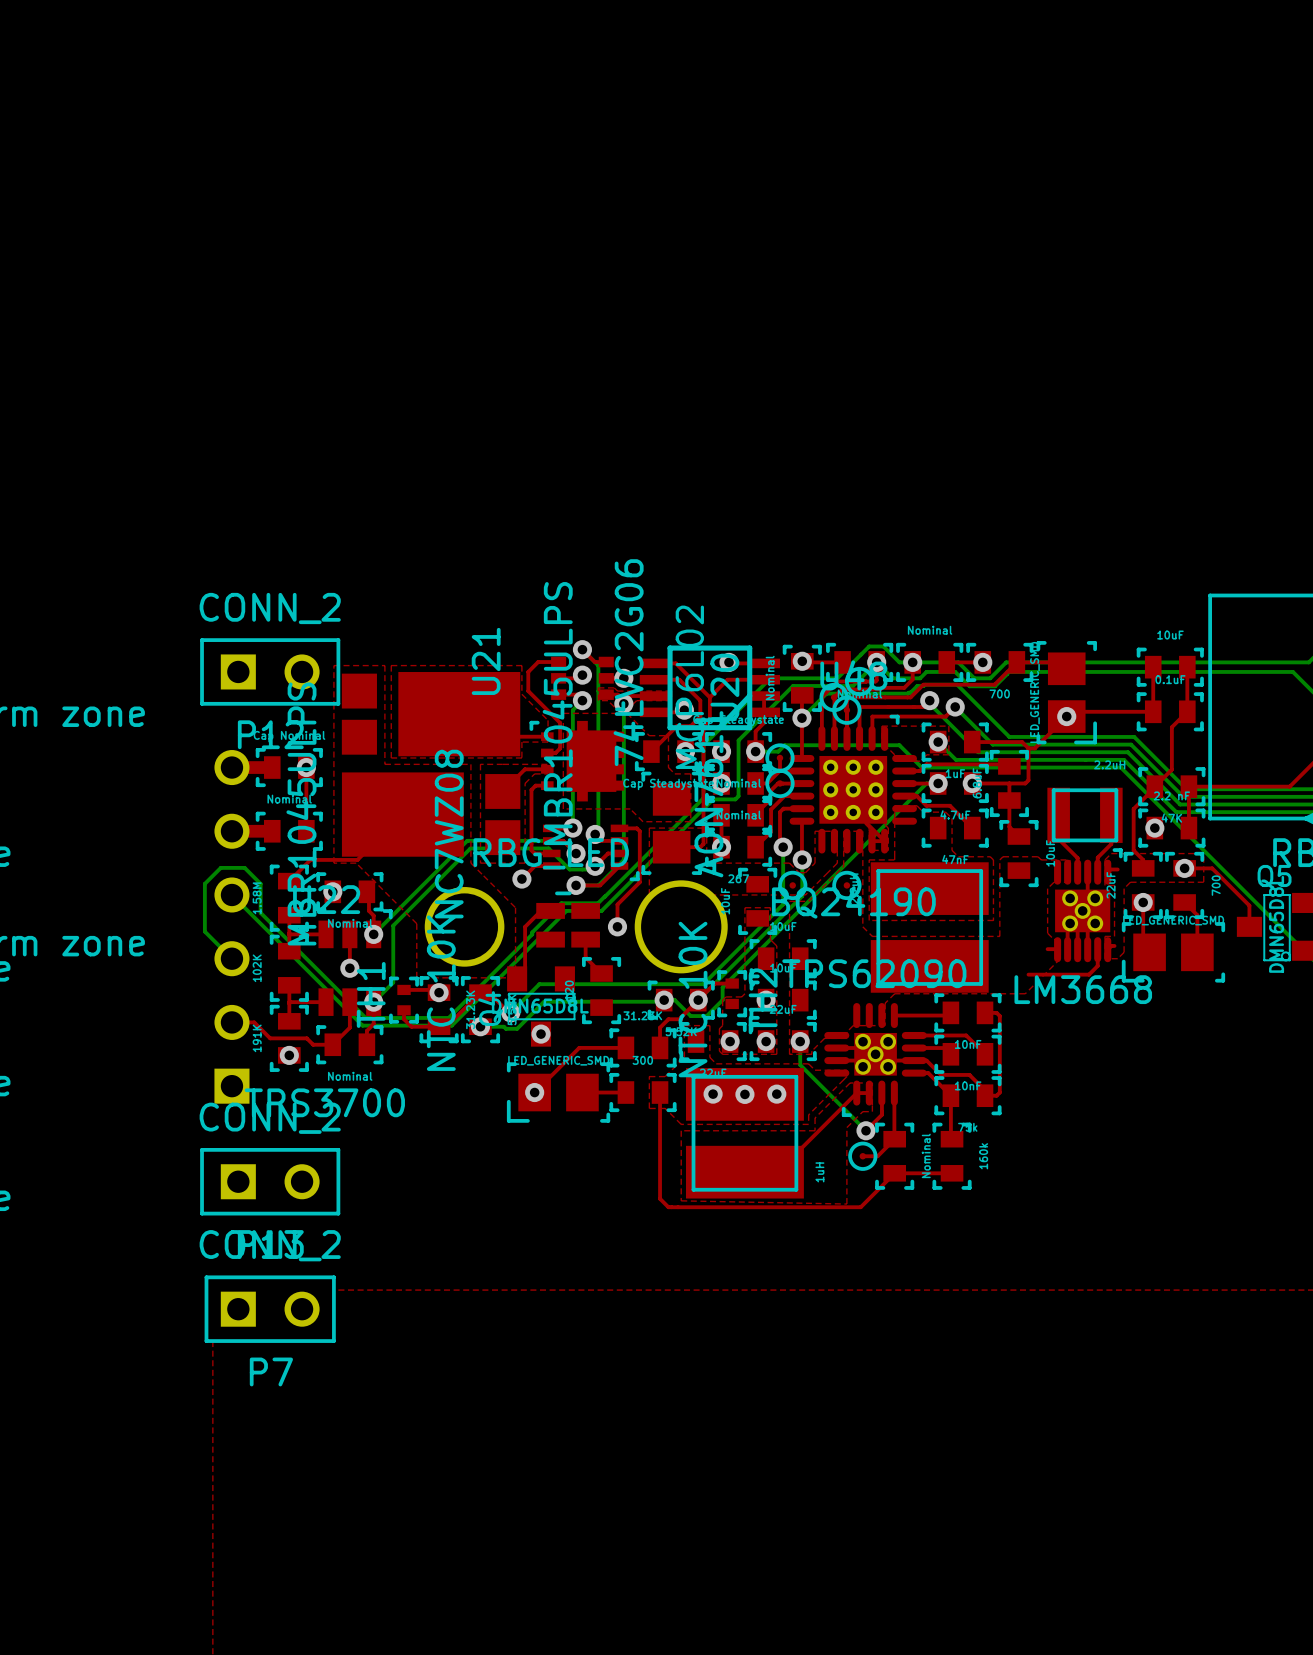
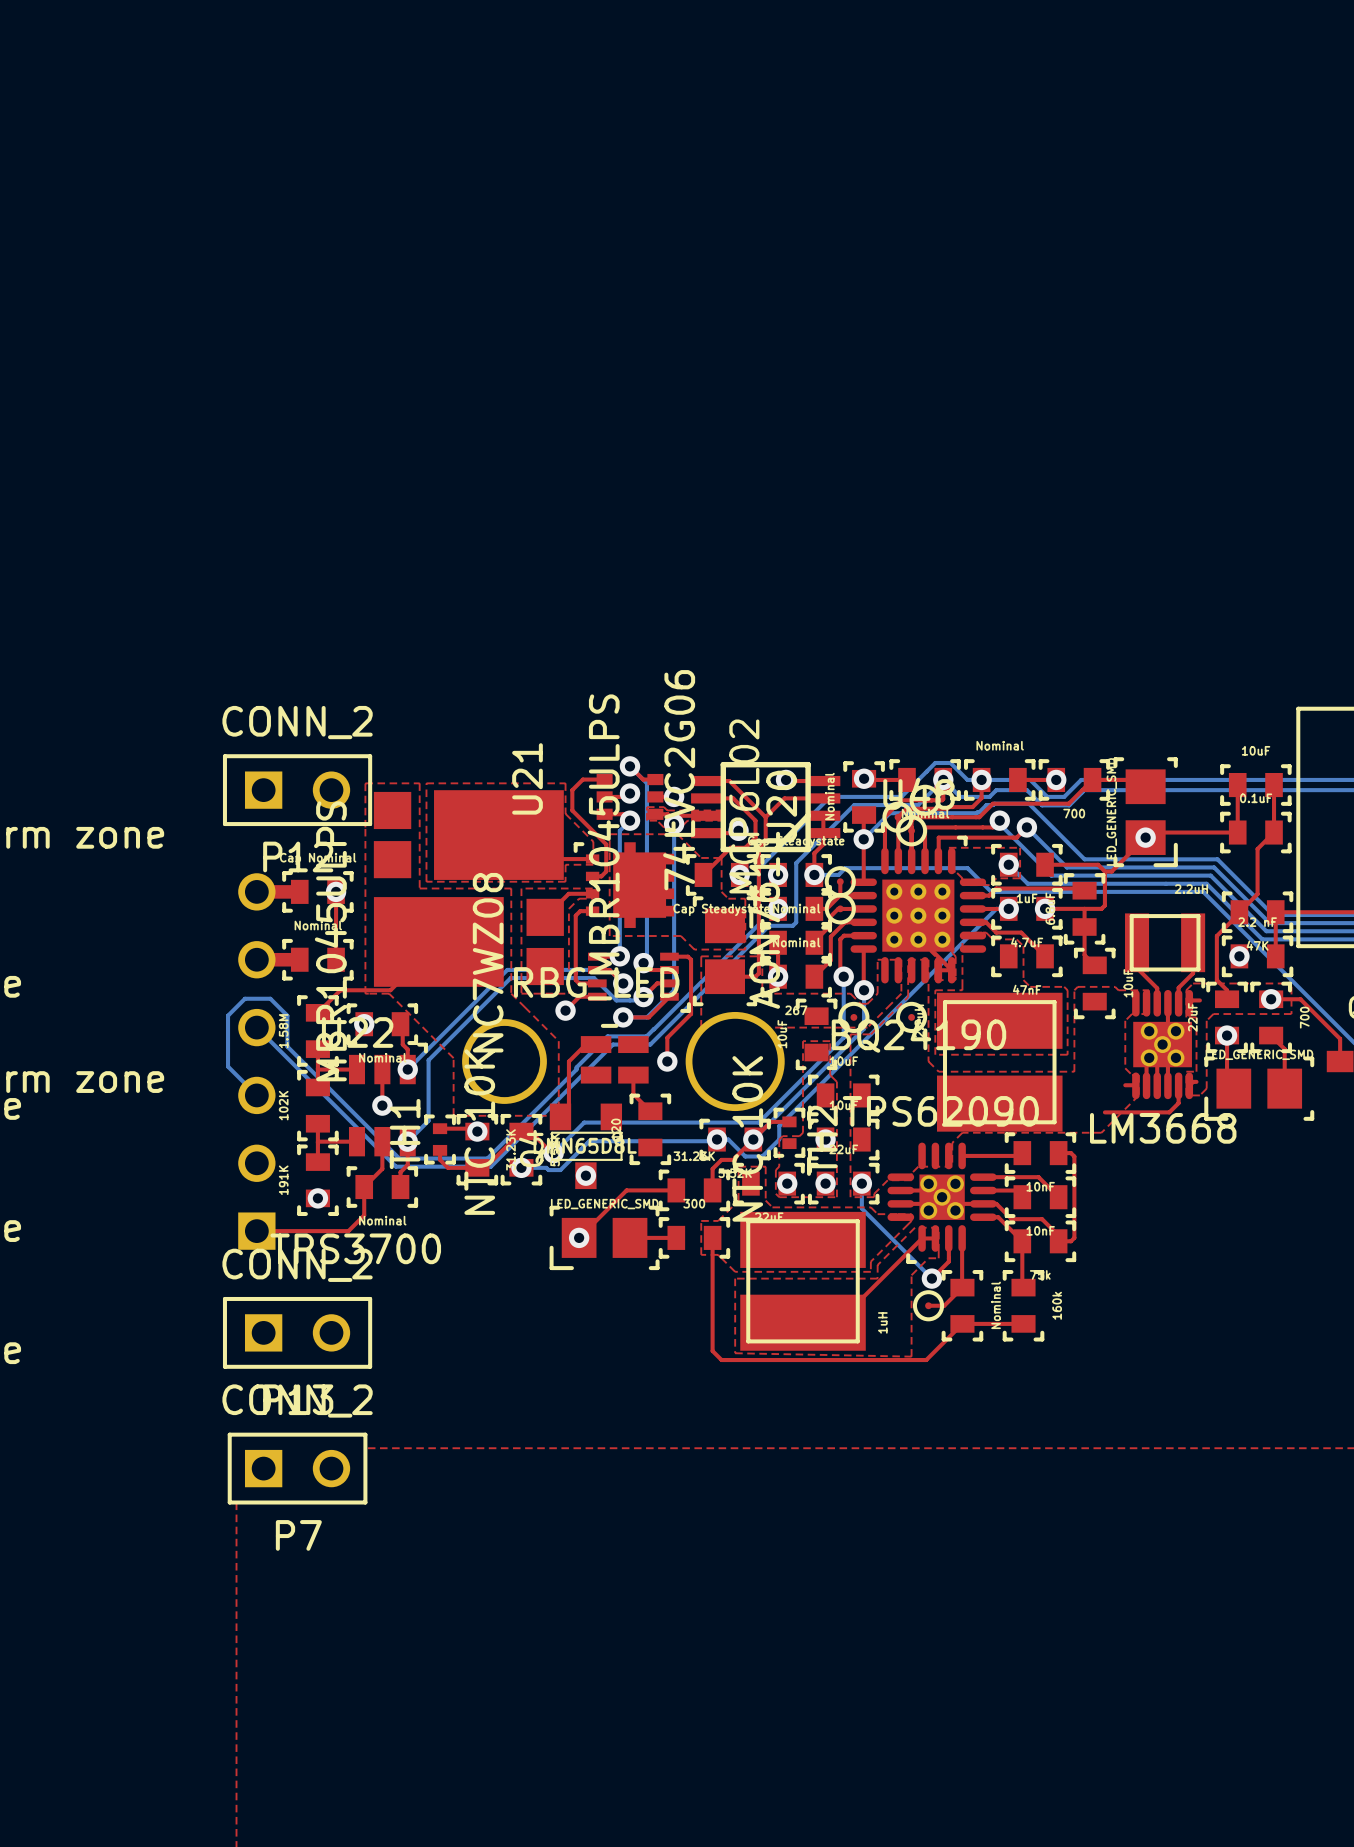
top track: (231, 1022) (254, 1022) (270, 1038) (306, 1038) (313, 1044) (332, 1044) -> (256, 1231) (348, 1231) (364, 1215) (364, 1187)
via: (713, 1094) -> none
via: (744, 1094) -> none
via: (776, 1094) -> none

